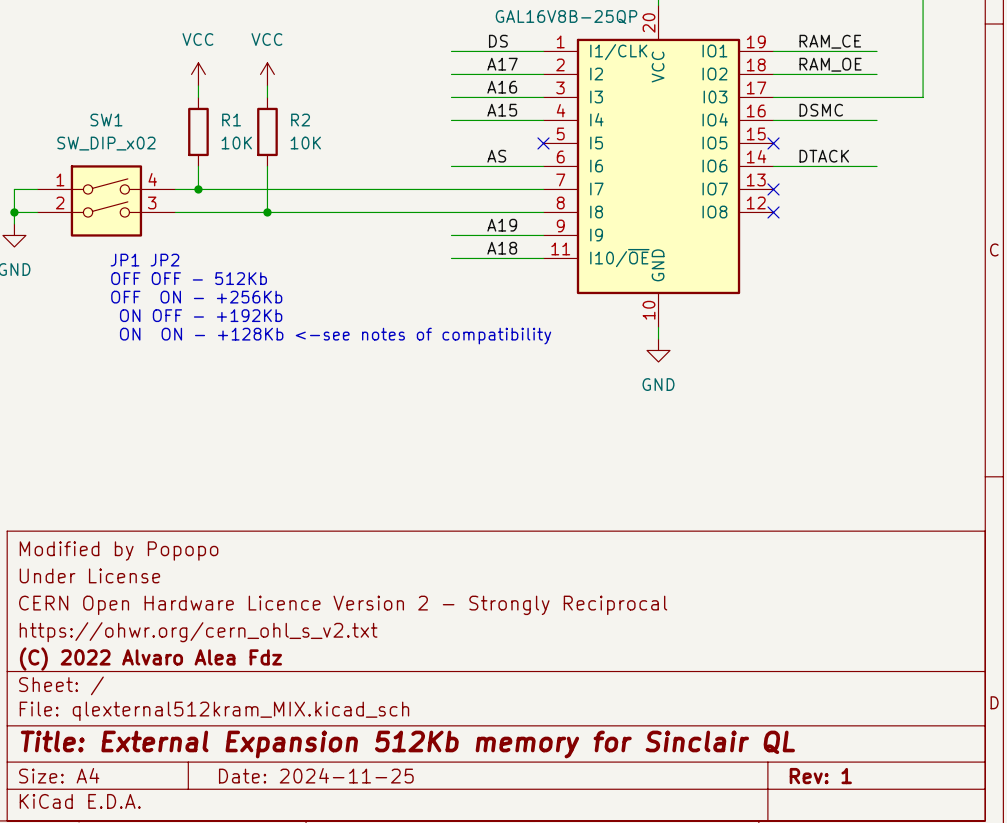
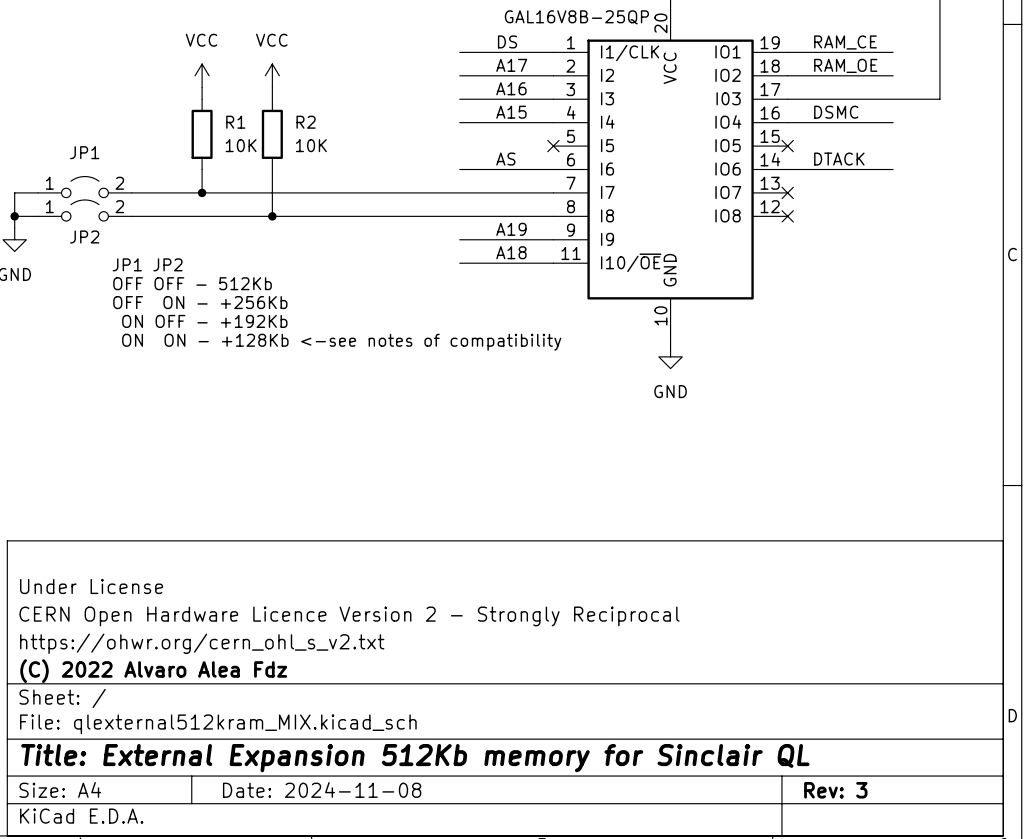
JP1: none -> (84, 187)
SW1: SW_DIP_x02 (106, 200) -> none
JP2: none -> (84, 210)
title block: Modified by Popopo (119, 551) -> none
title block: Date: 2024-11-25 (316, 775) -> Date: 2024-11-08 (322, 789)
title block: Rev: 1 (820, 776) -> Rev: 3 (835, 790)

